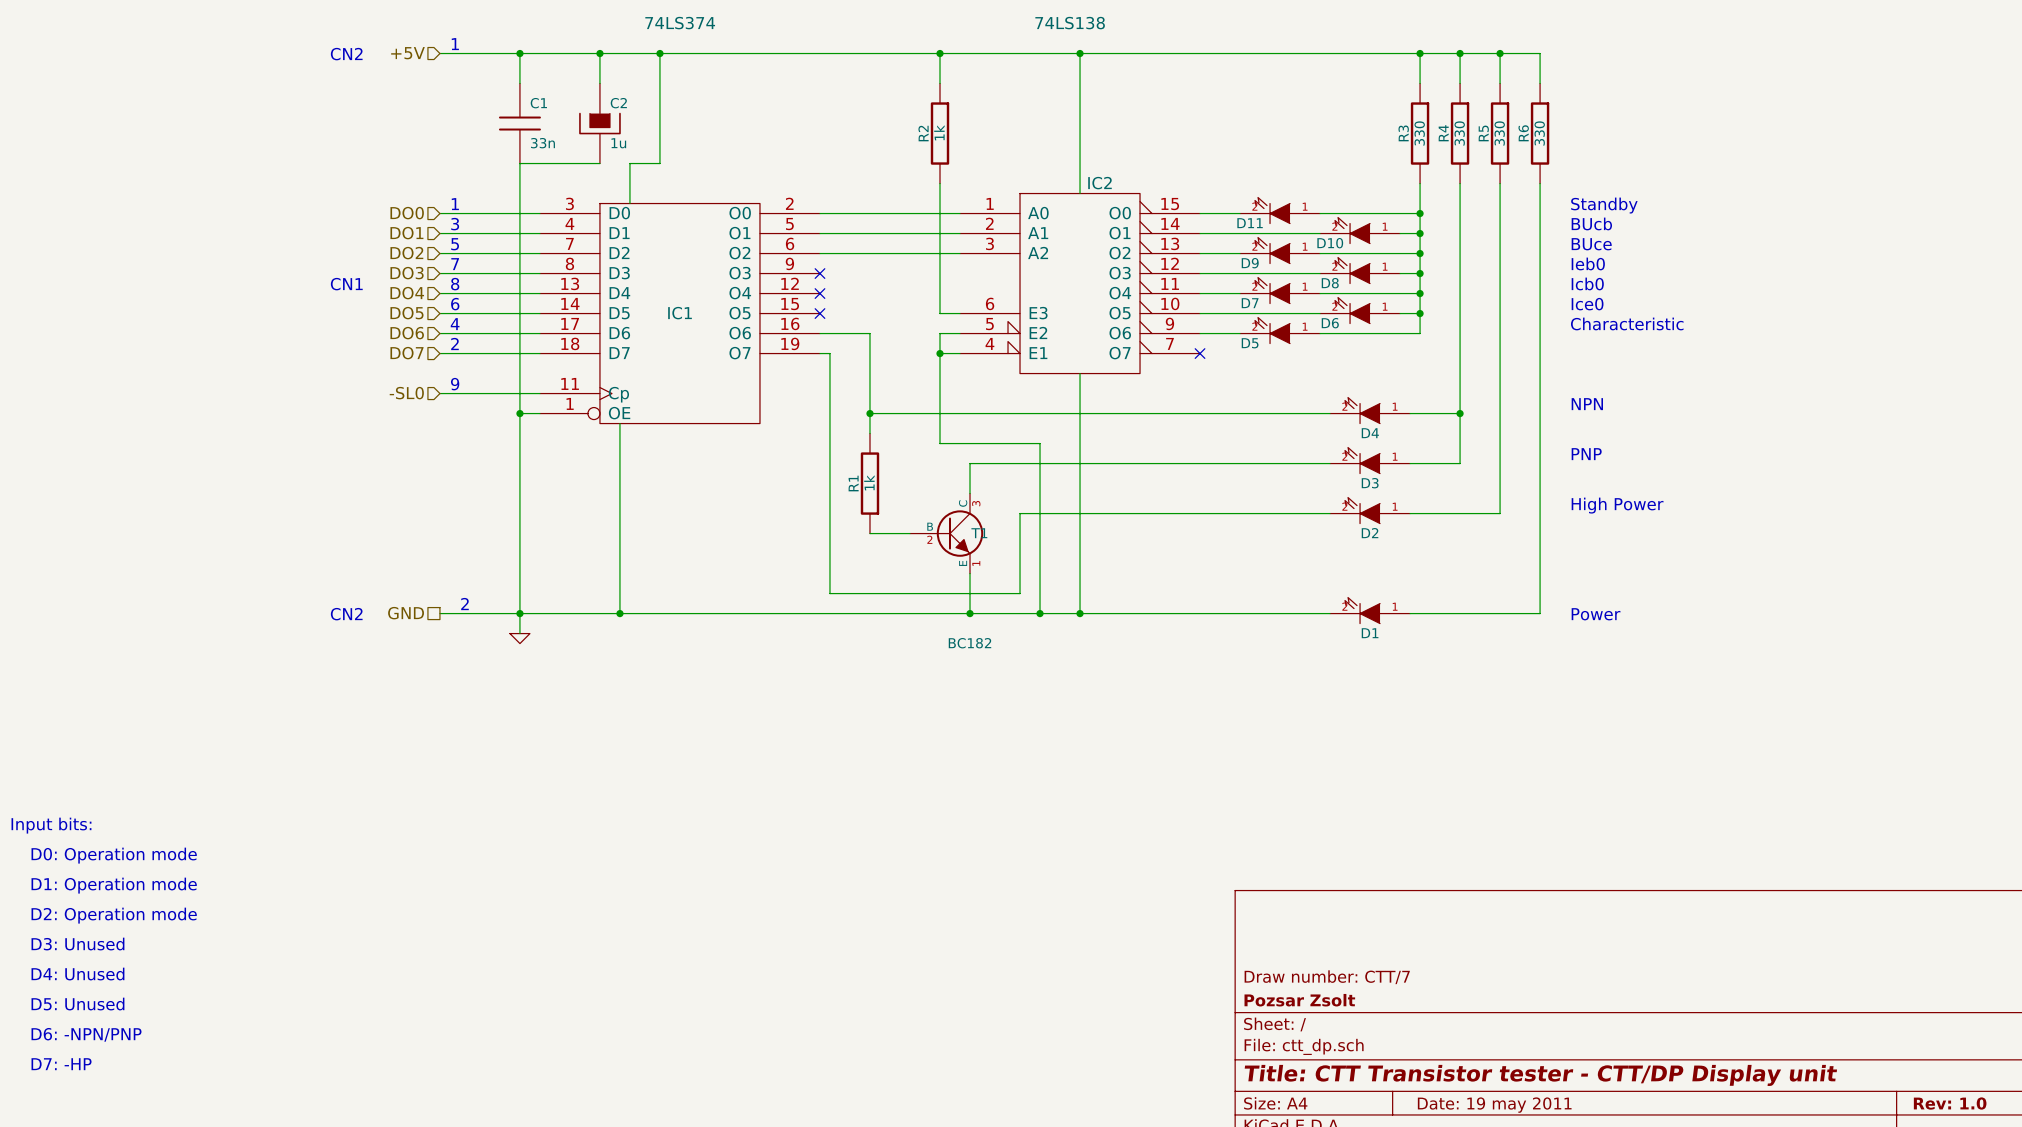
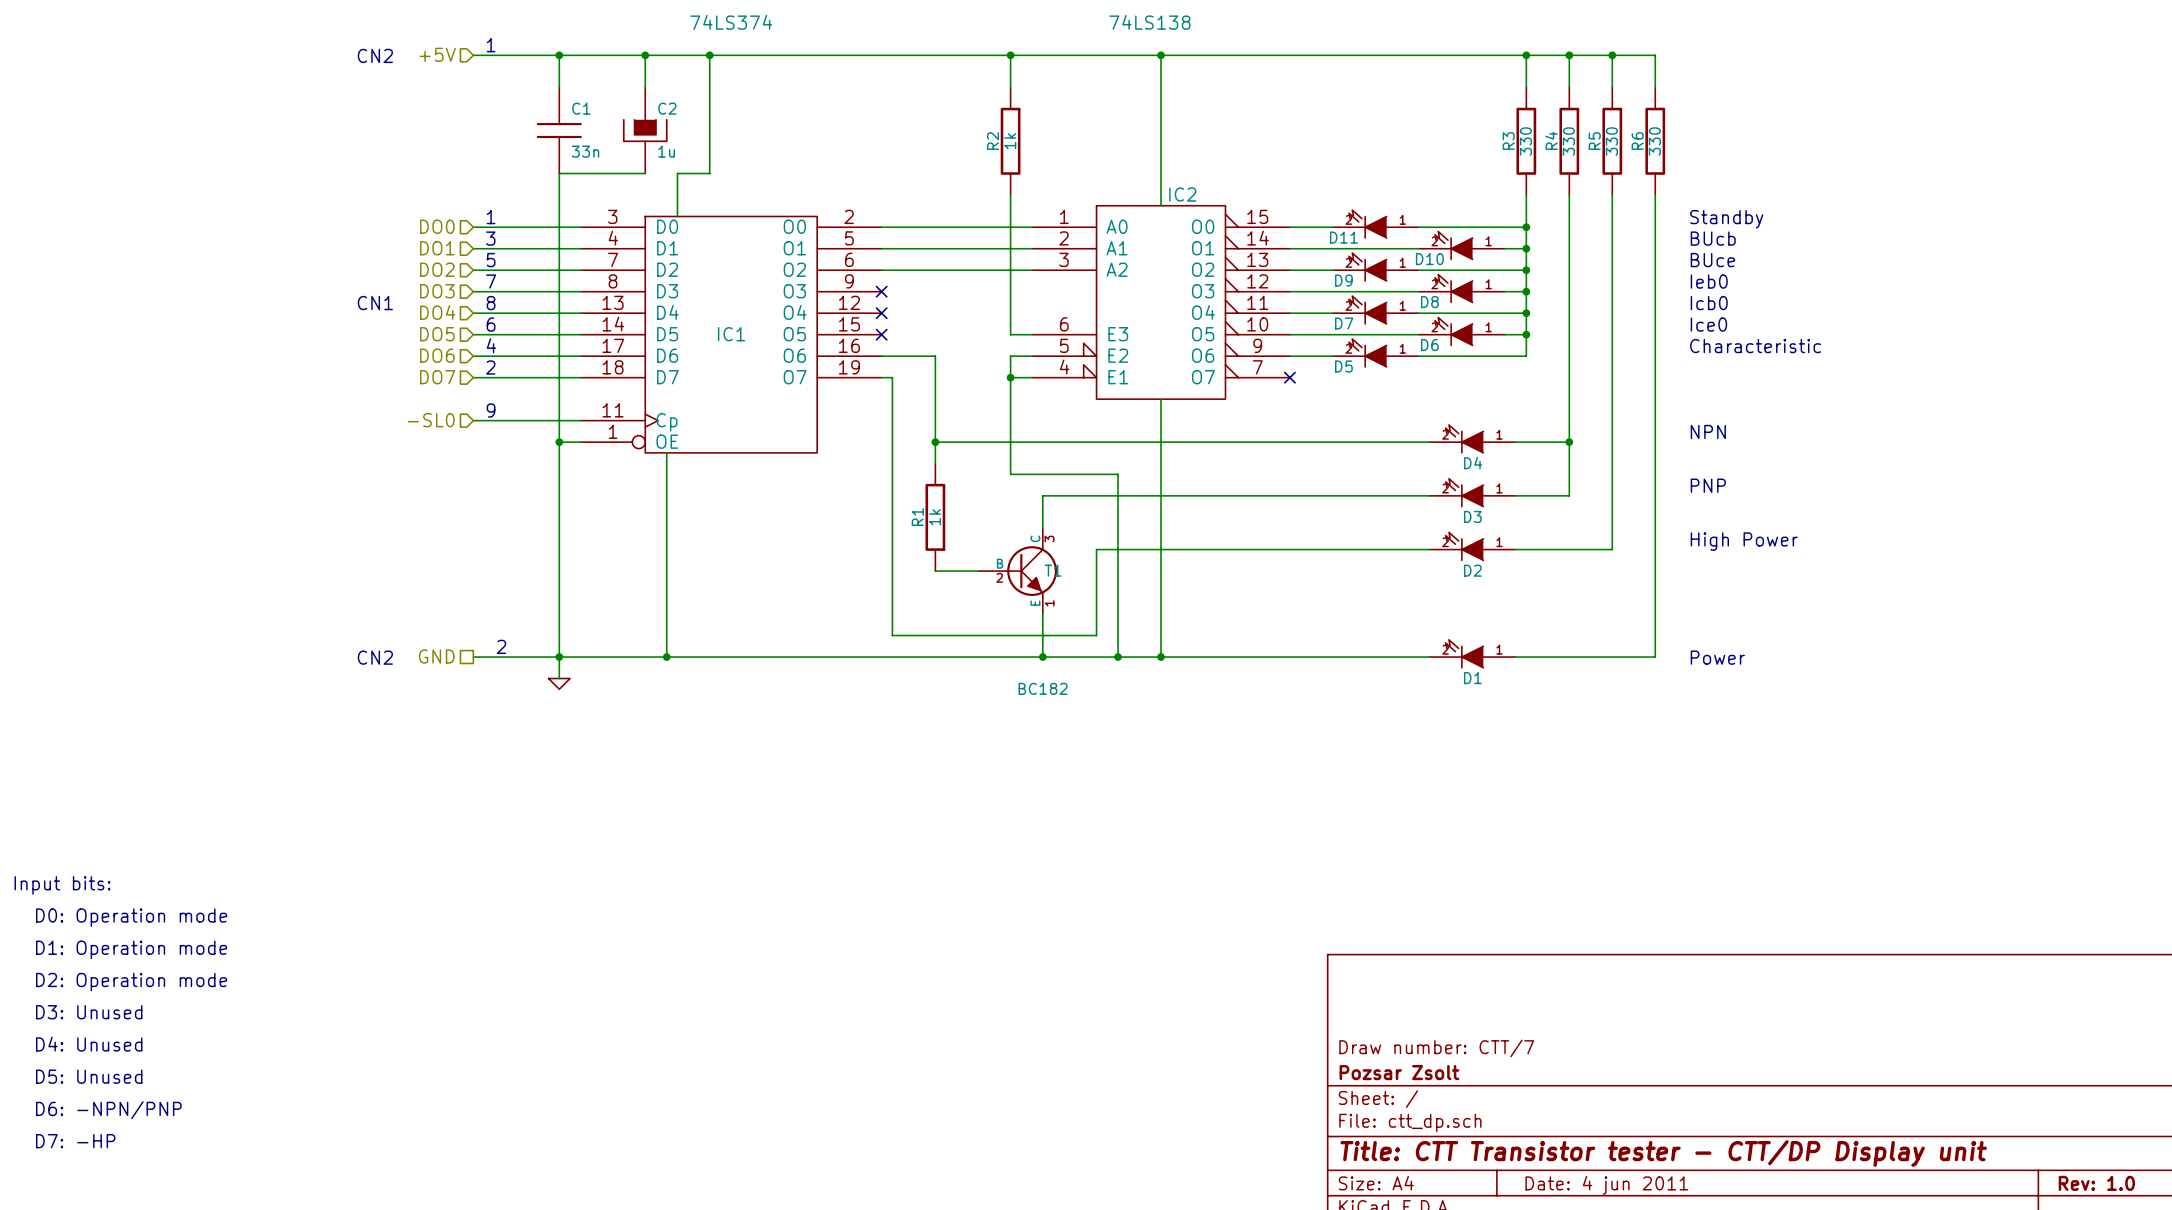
title block: Date: 19 may 2011 (1494, 1105) -> Date: 4 jun 2011 (1606, 1185)

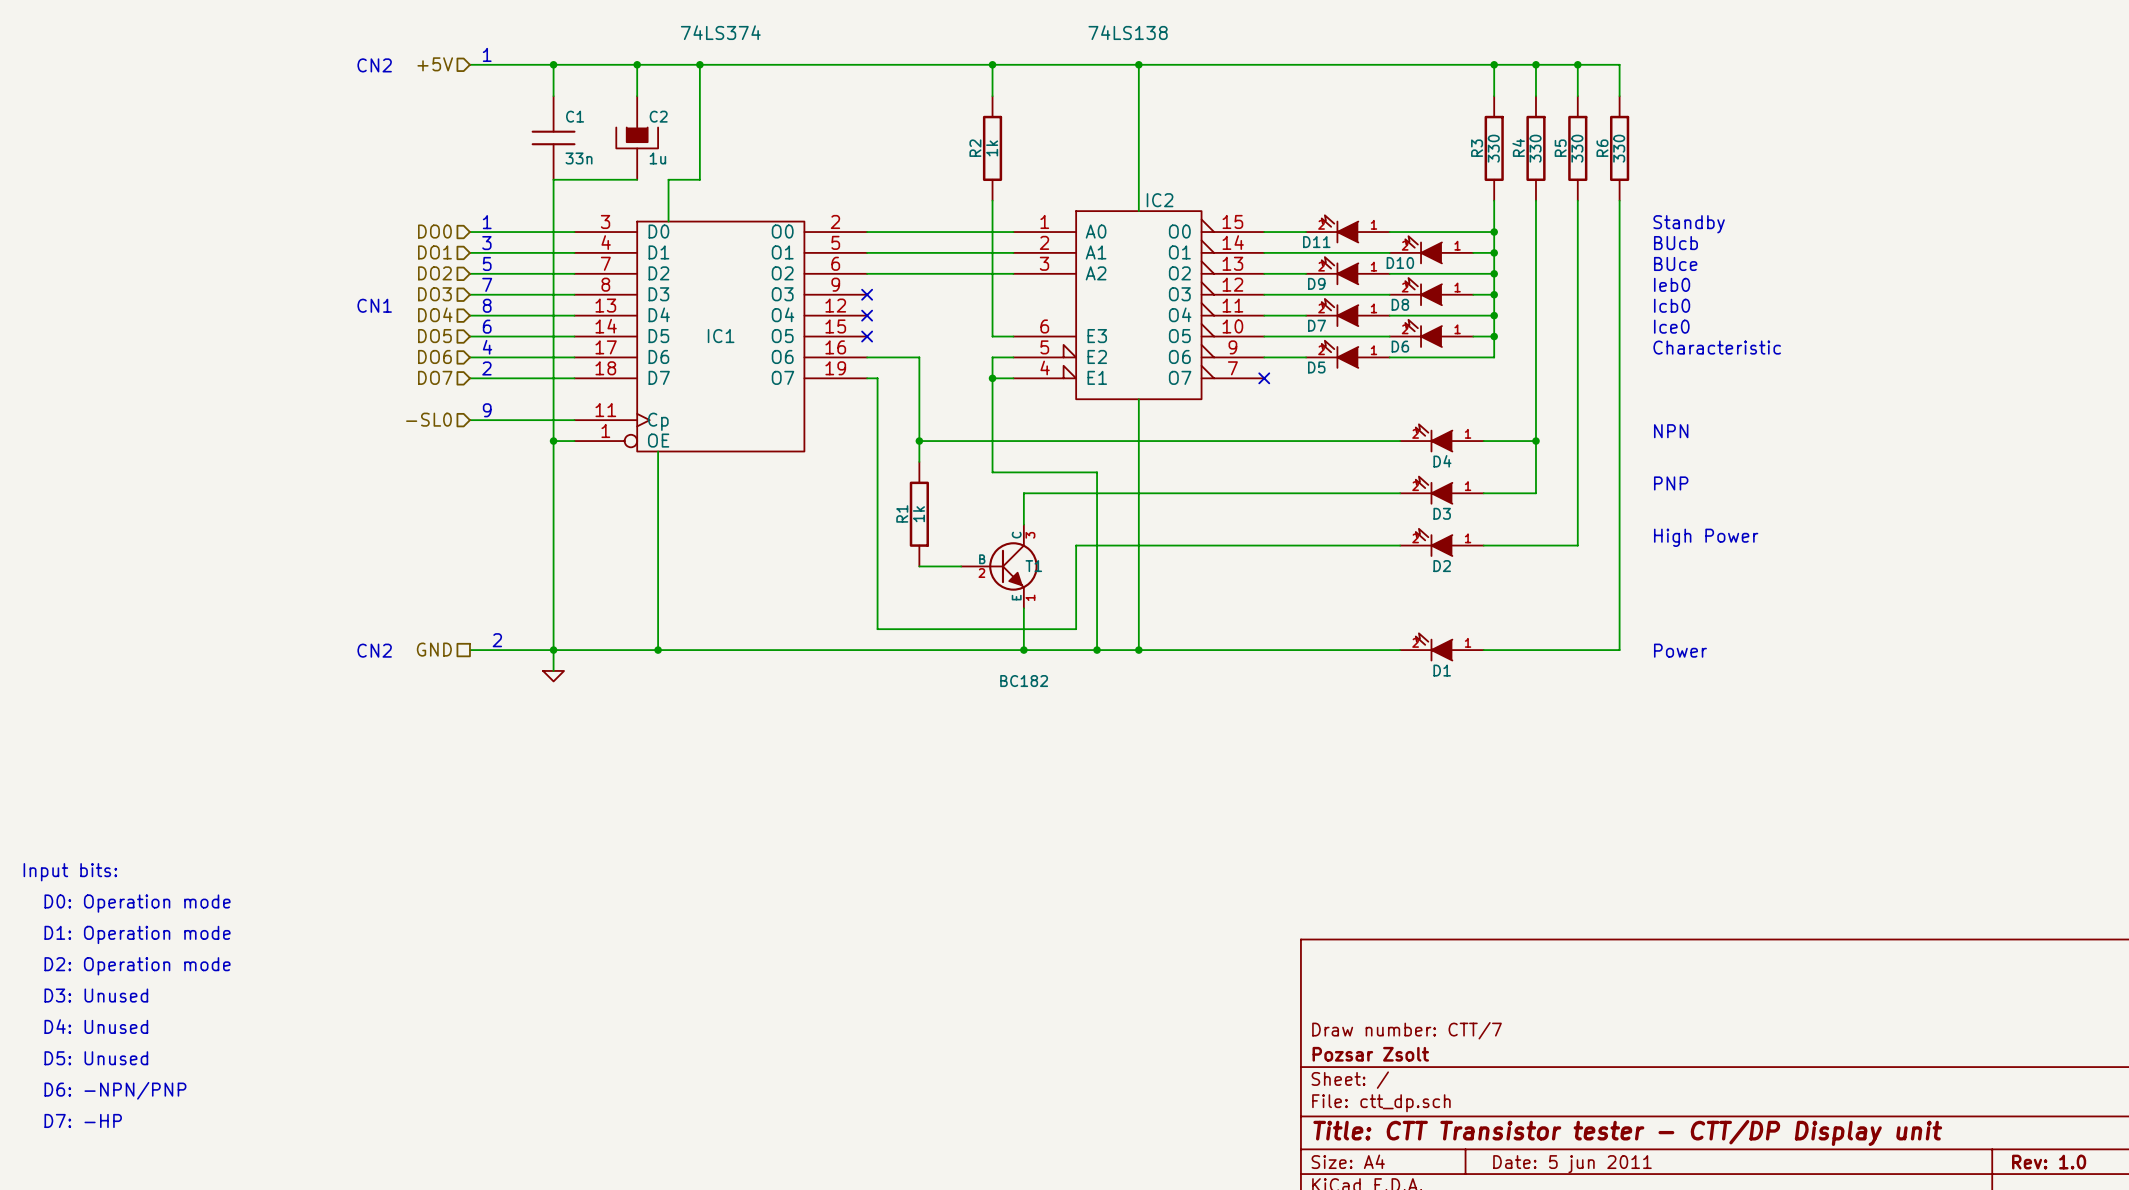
title block: Date: 4 jun 2011 (1606, 1185) -> Date: 5 jun 2011 (1572, 1164)

